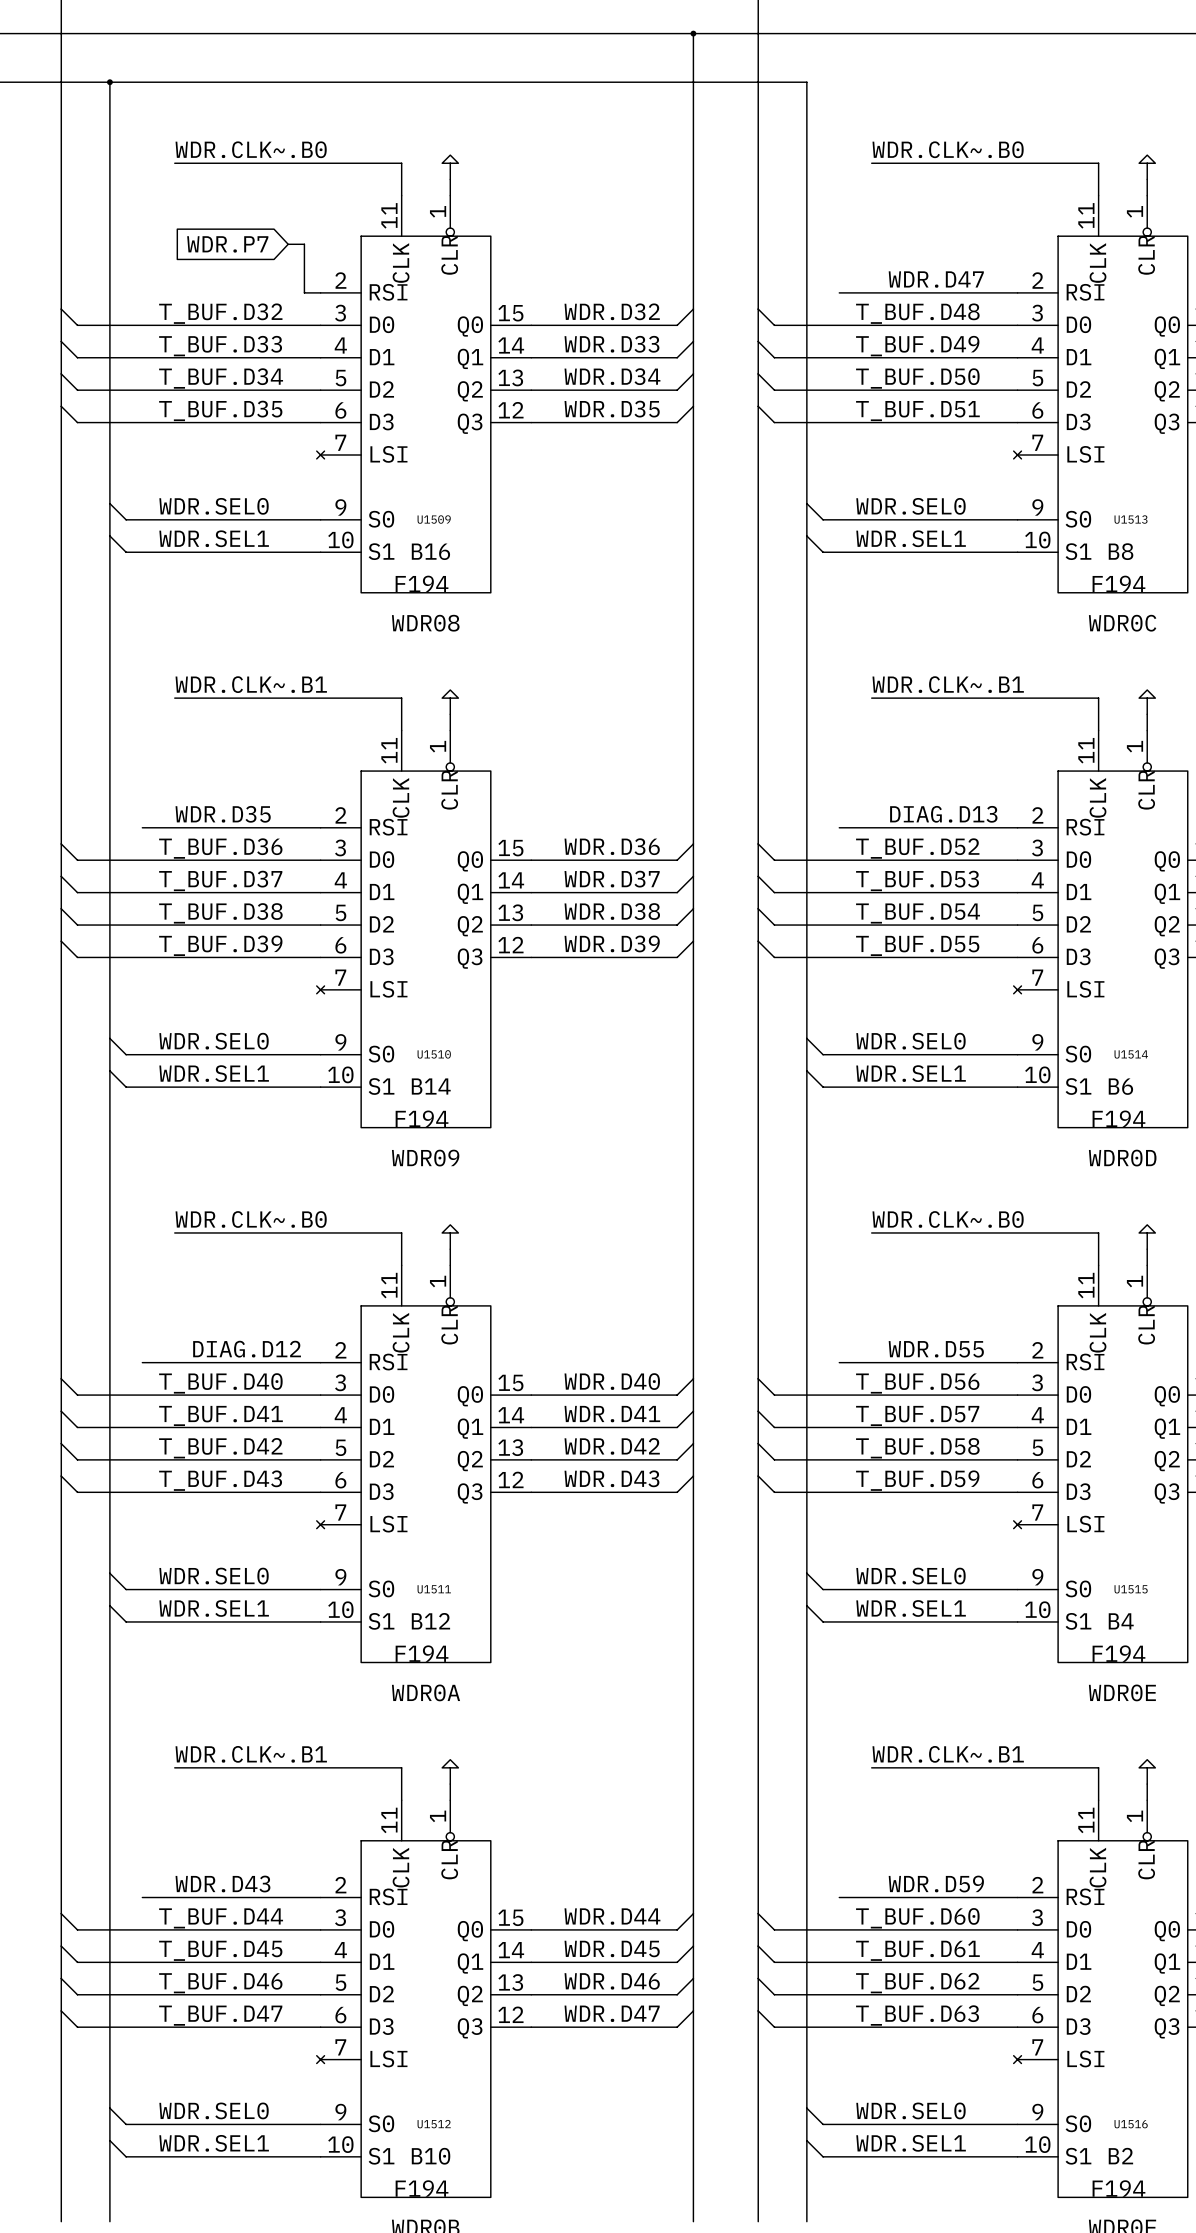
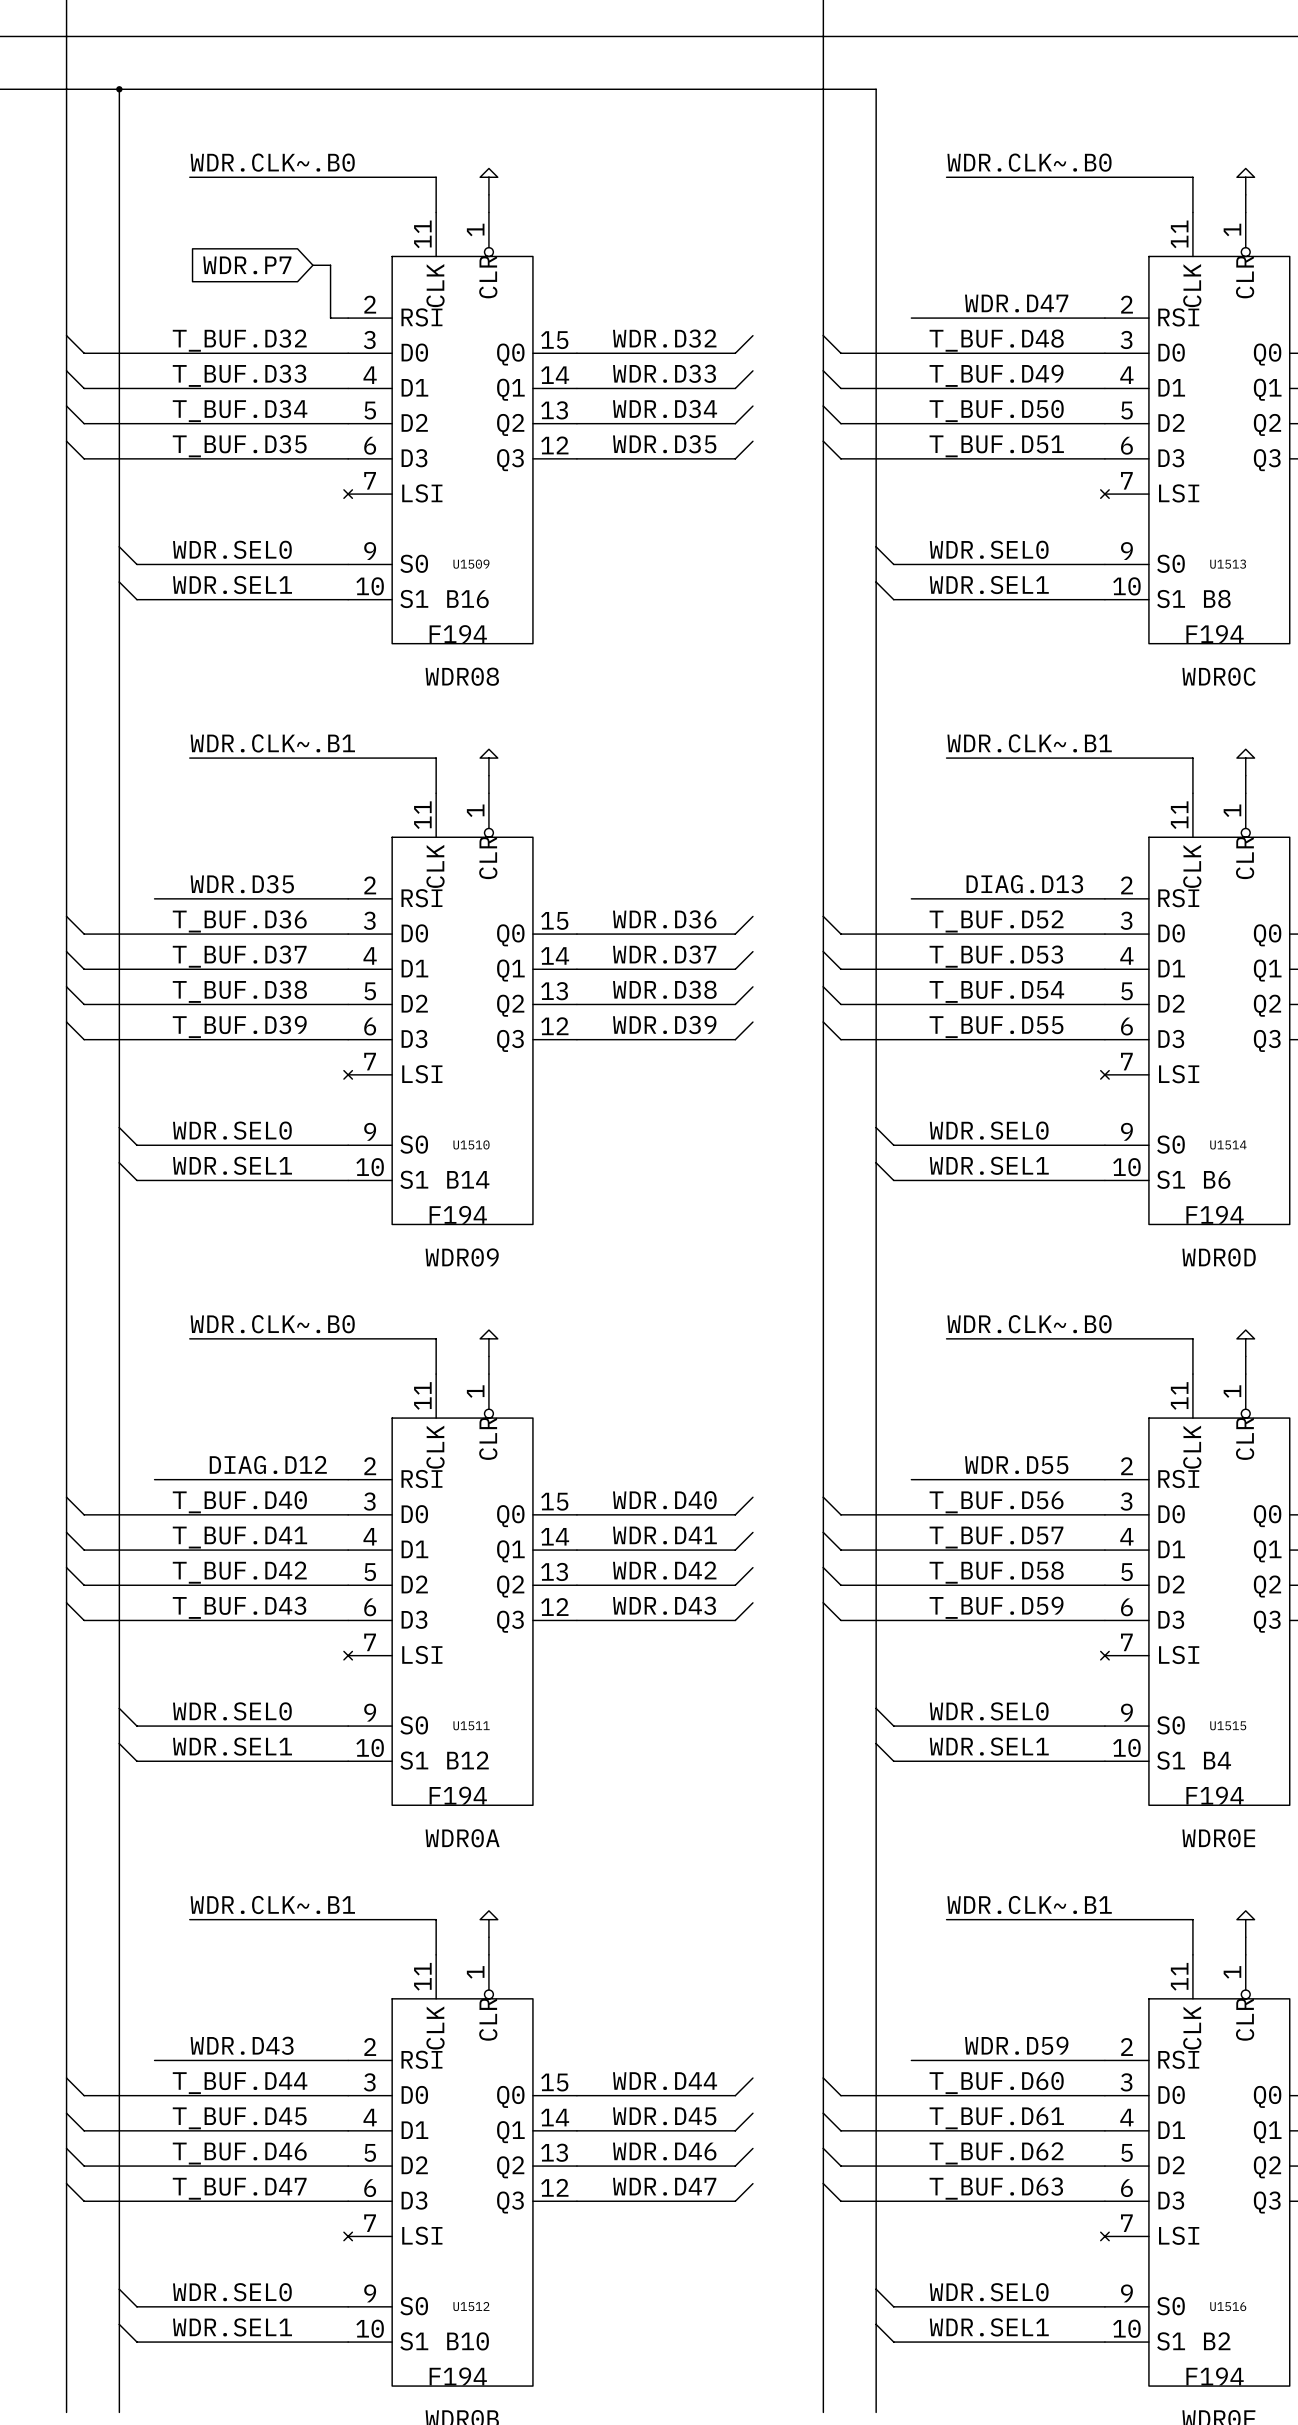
bus: (693, 33) (693, 2221) -> none
junction: (693, 33) -> none

